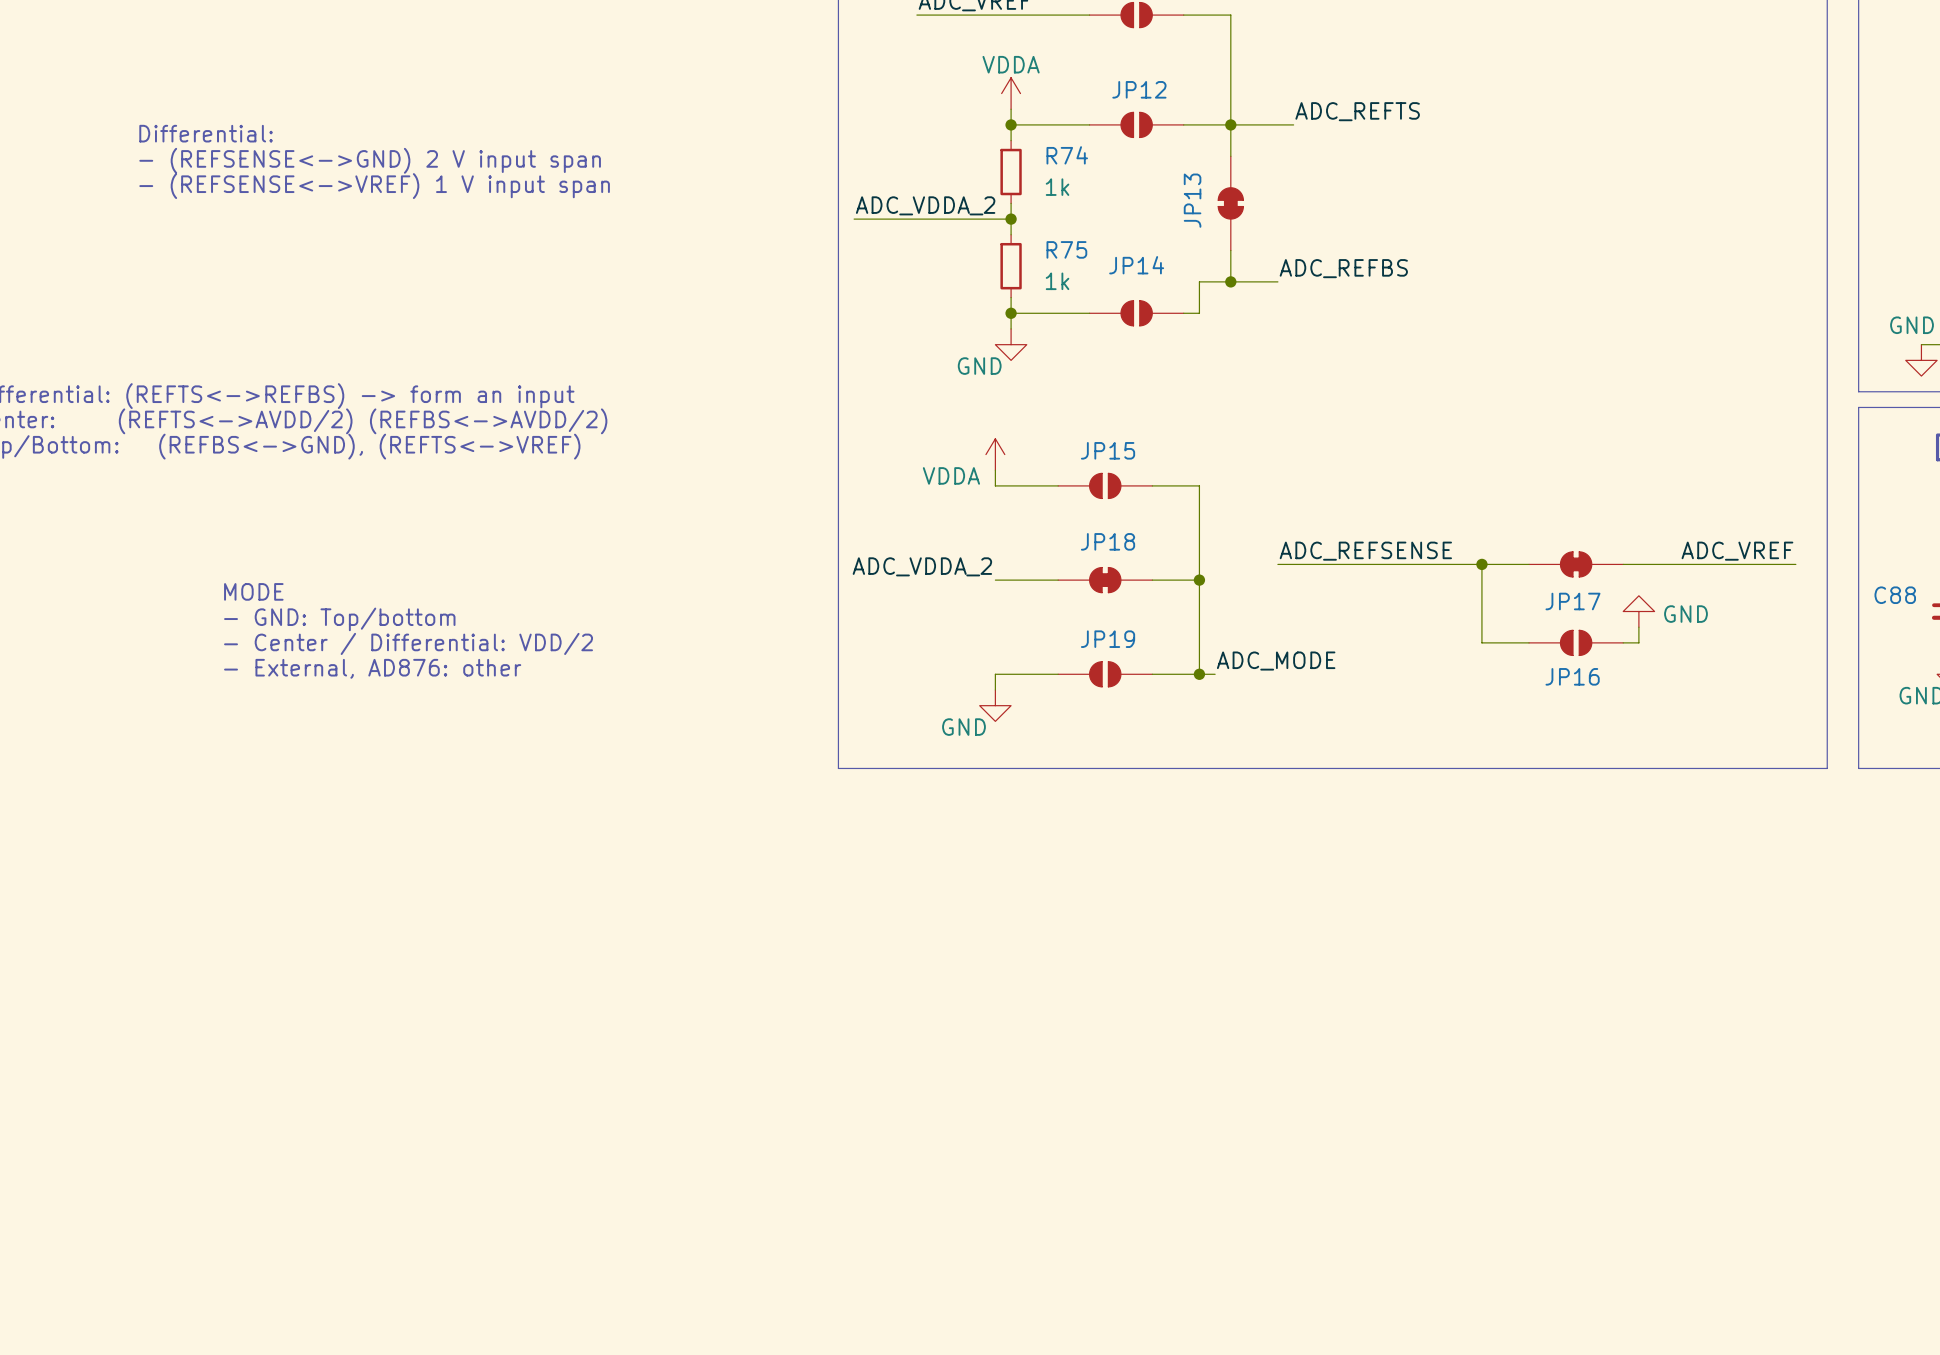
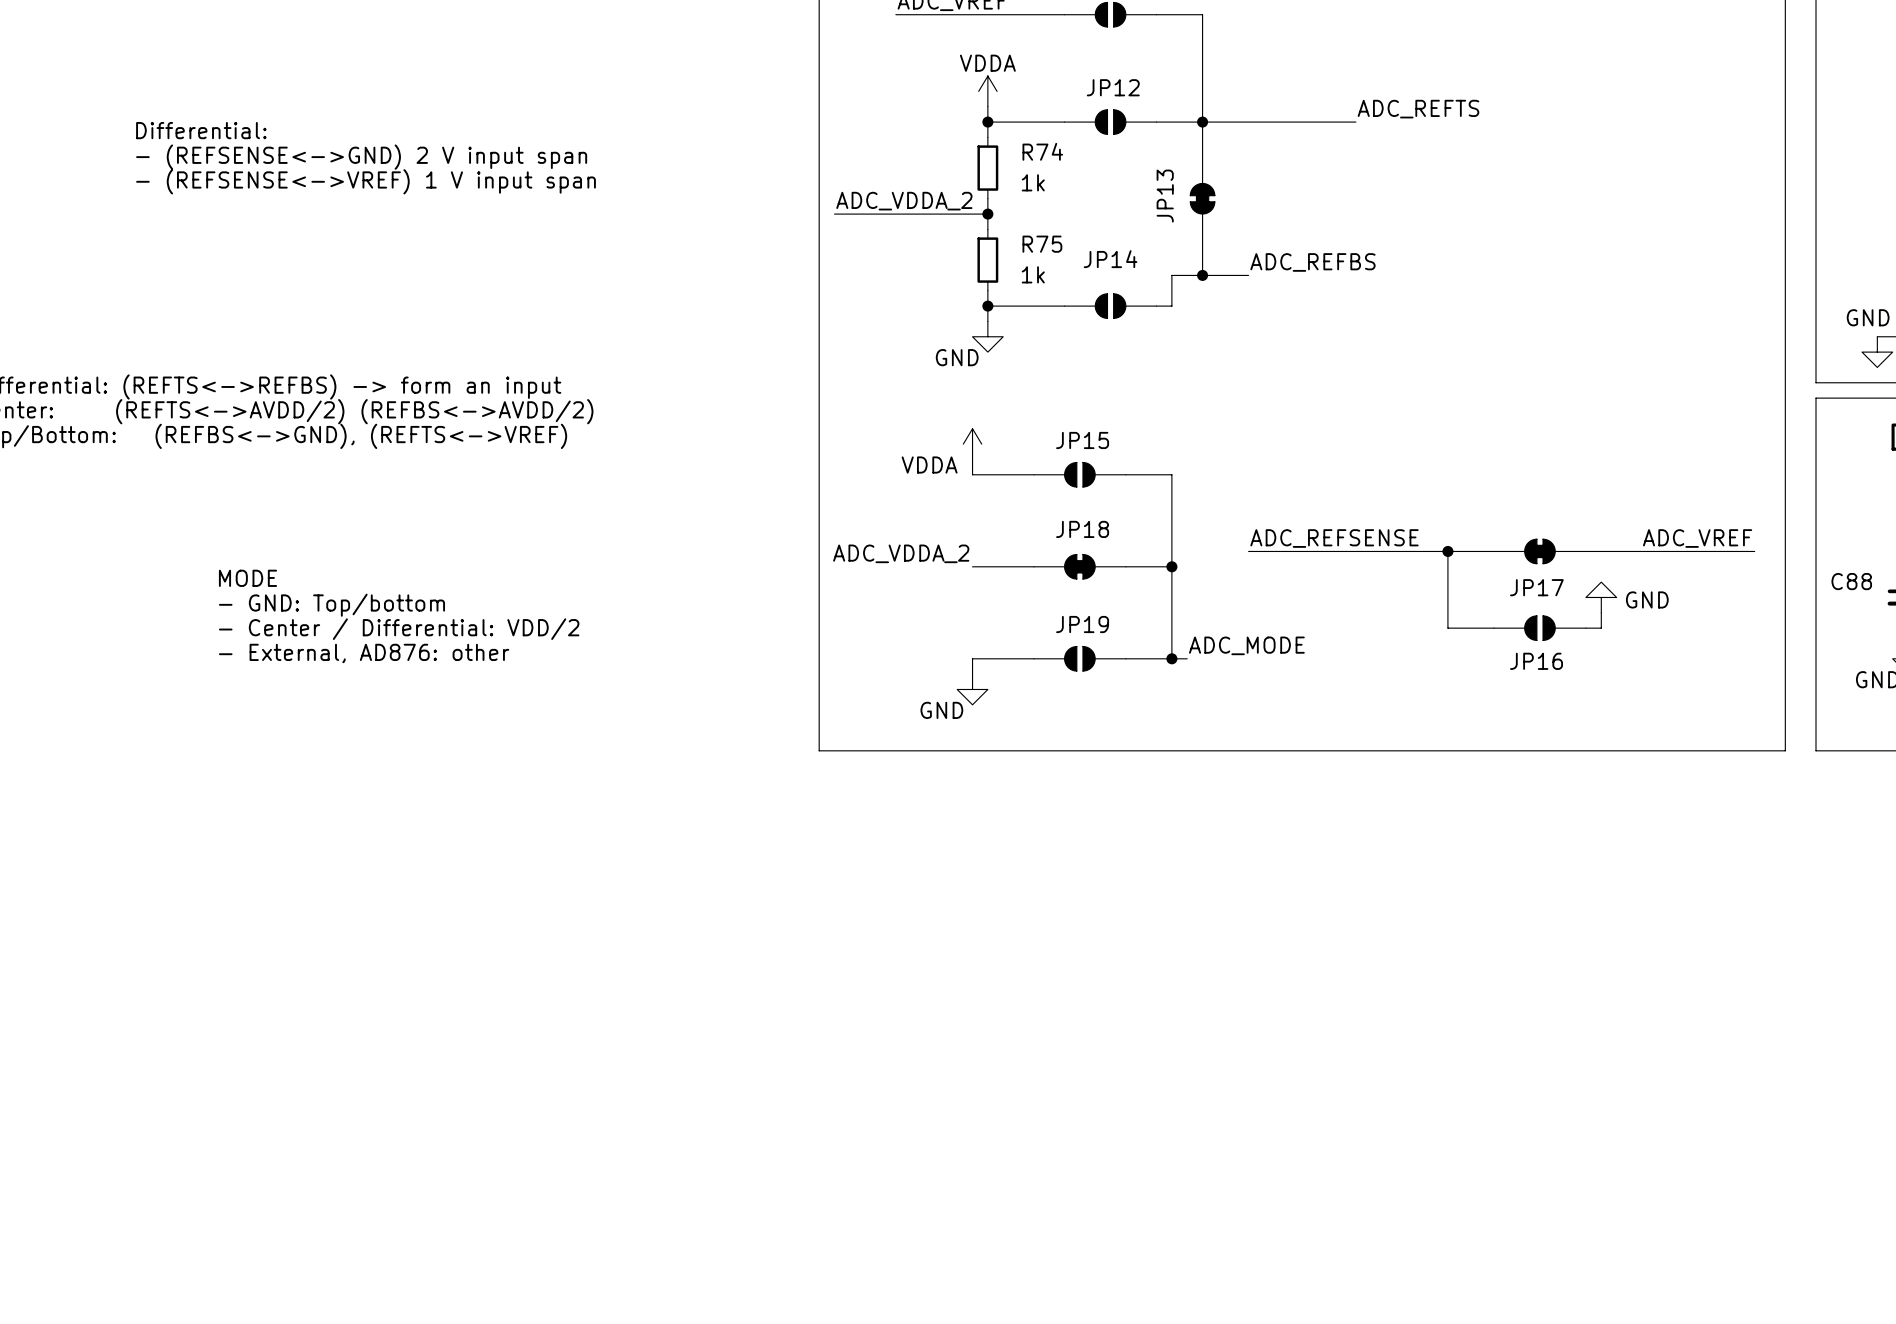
label position: ADC_REFTS (1357, 111) -> ADC_REFTS (1418, 109)
wire: none -> (1263, 122) (1355, 122)

